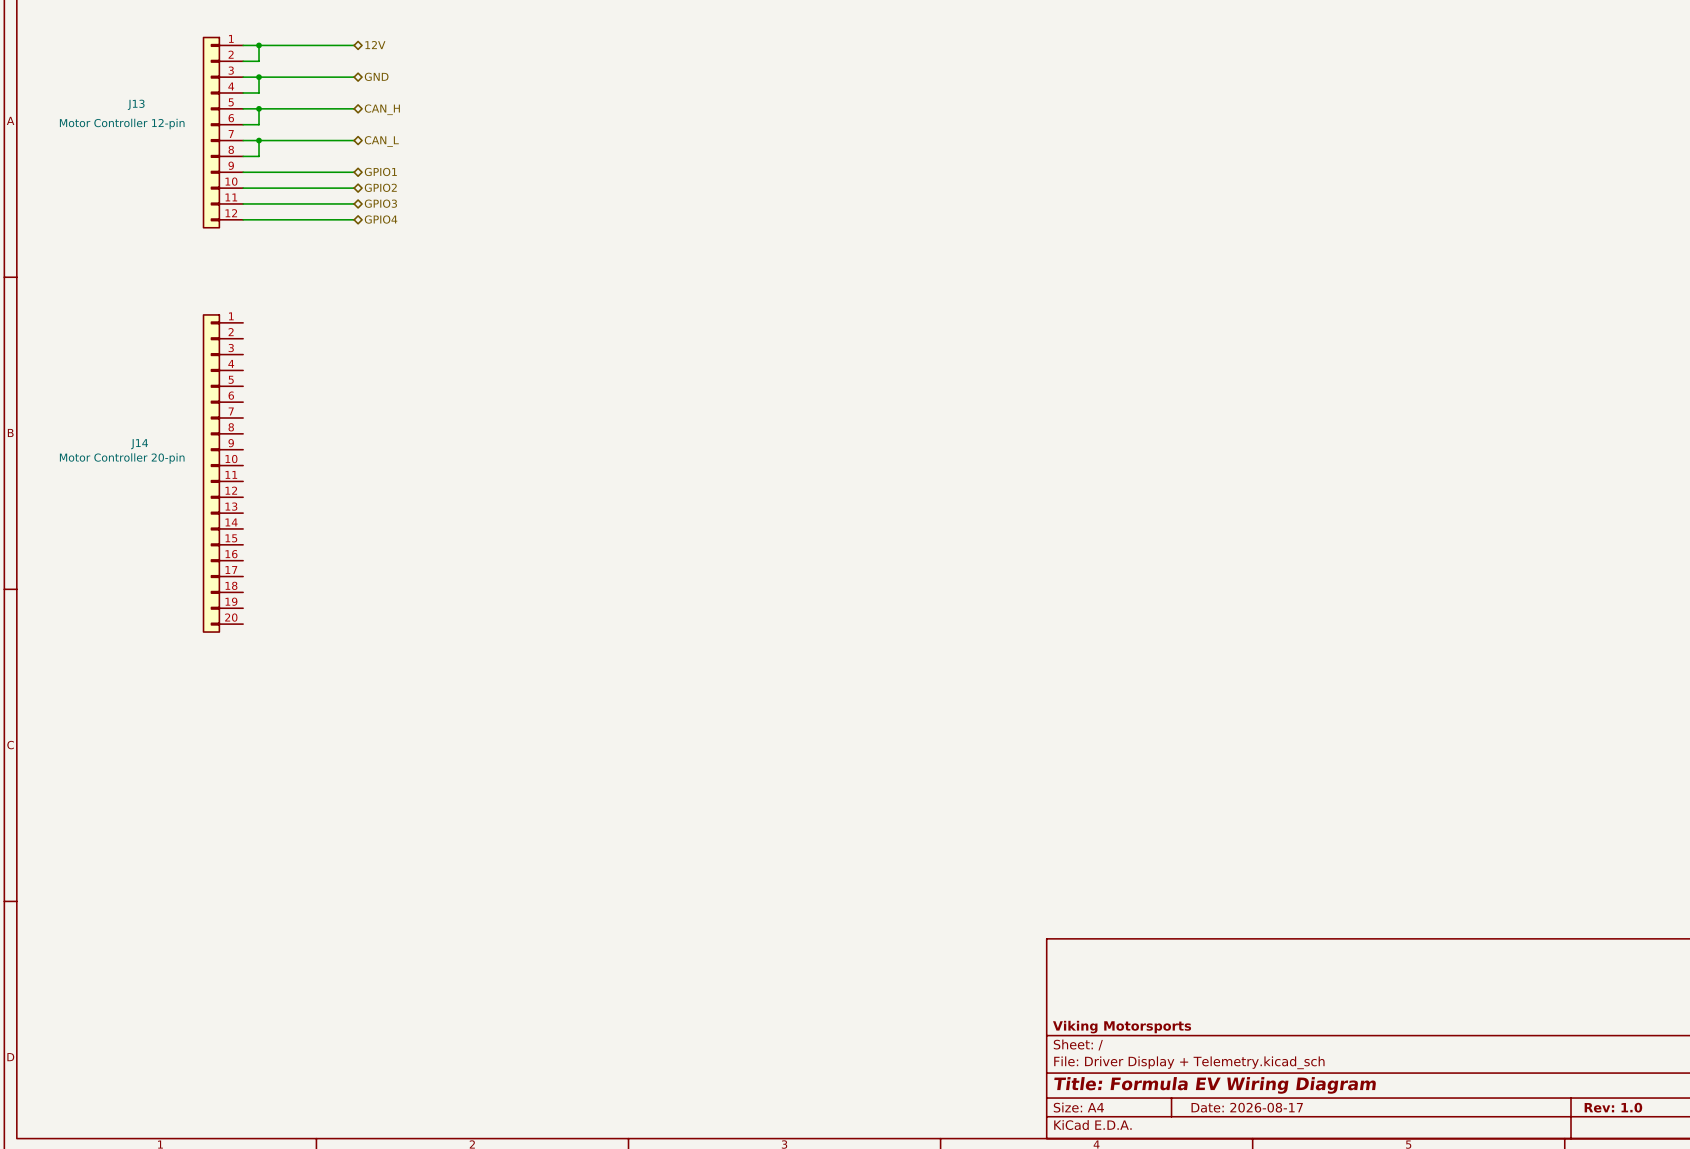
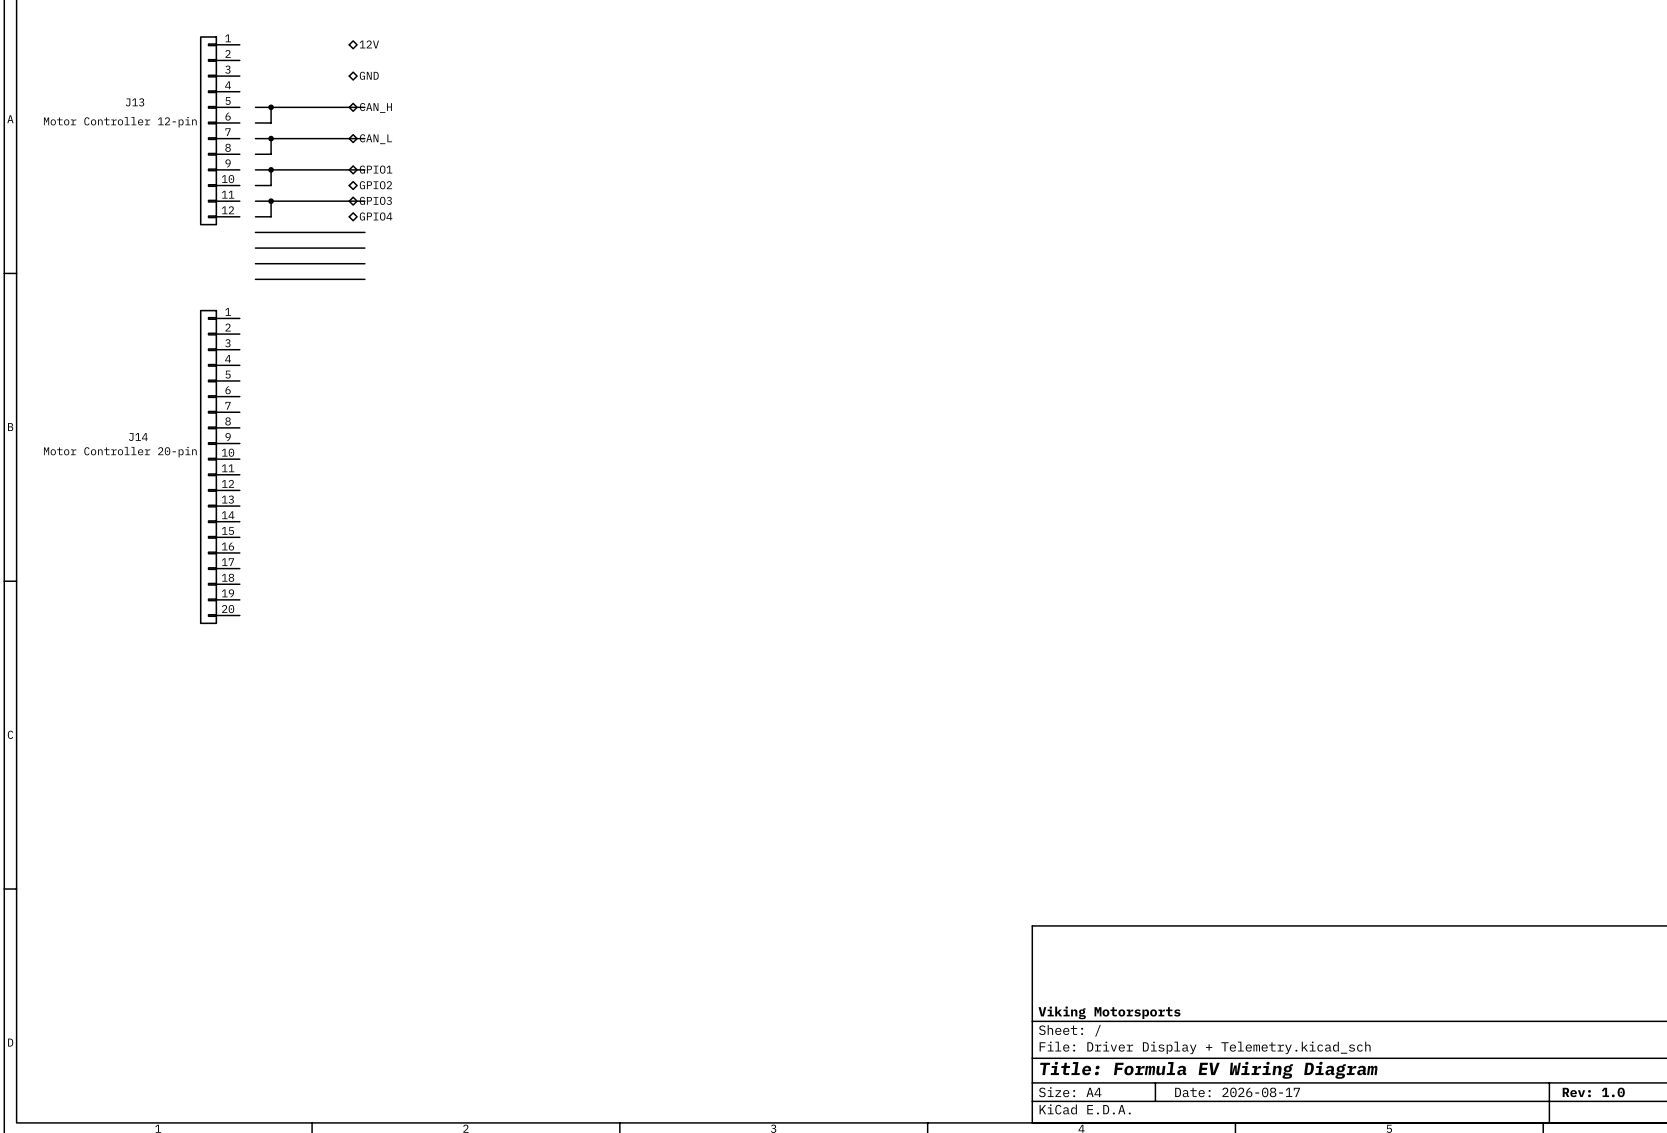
wire: (243, 45) (354, 45) -> none
wire: (259, 45) (259, 61) (243, 61) -> (271, 107) (271, 122) (255, 122)
junction: (259, 45) -> none
wire: (243, 77) (354, 77) -> none
wire: (259, 77) (259, 92) (243, 92) -> (271, 138) (271, 154) (255, 154)
junction: (259, 77) -> none
wire: (243, 108) (259, 108) (259, 124) (243, 124) -> none
junction position: (259, 108) -> (271, 107)
wire: none -> (349, 107) (364, 107)
wire: (243, 140) (259, 140) (259, 156) (243, 156) -> none
junction position: (259, 140) -> (271, 138)
wire: (243, 172) (259, 172) -> (349, 169) (364, 169)
junction: none -> (271, 169)
wire: (243, 188) (259, 188) -> (349, 138) (364, 138)
wire: (274, 188) (354, 188) -> (271, 185) (271, 169)
wire: (243, 203) (259, 203) -> (349, 201) (364, 201)
junction: none -> (271, 201)
wire: (243, 219) (259, 219) -> none
wire: (274, 219) (354, 219) -> (271, 216) (271, 201)
wire: none -> (255, 232) (364, 232)
wire: none -> (255, 248) (364, 248)
wire: none -> (255, 263) (364, 263)
wire: none -> (255, 279) (364, 279)

